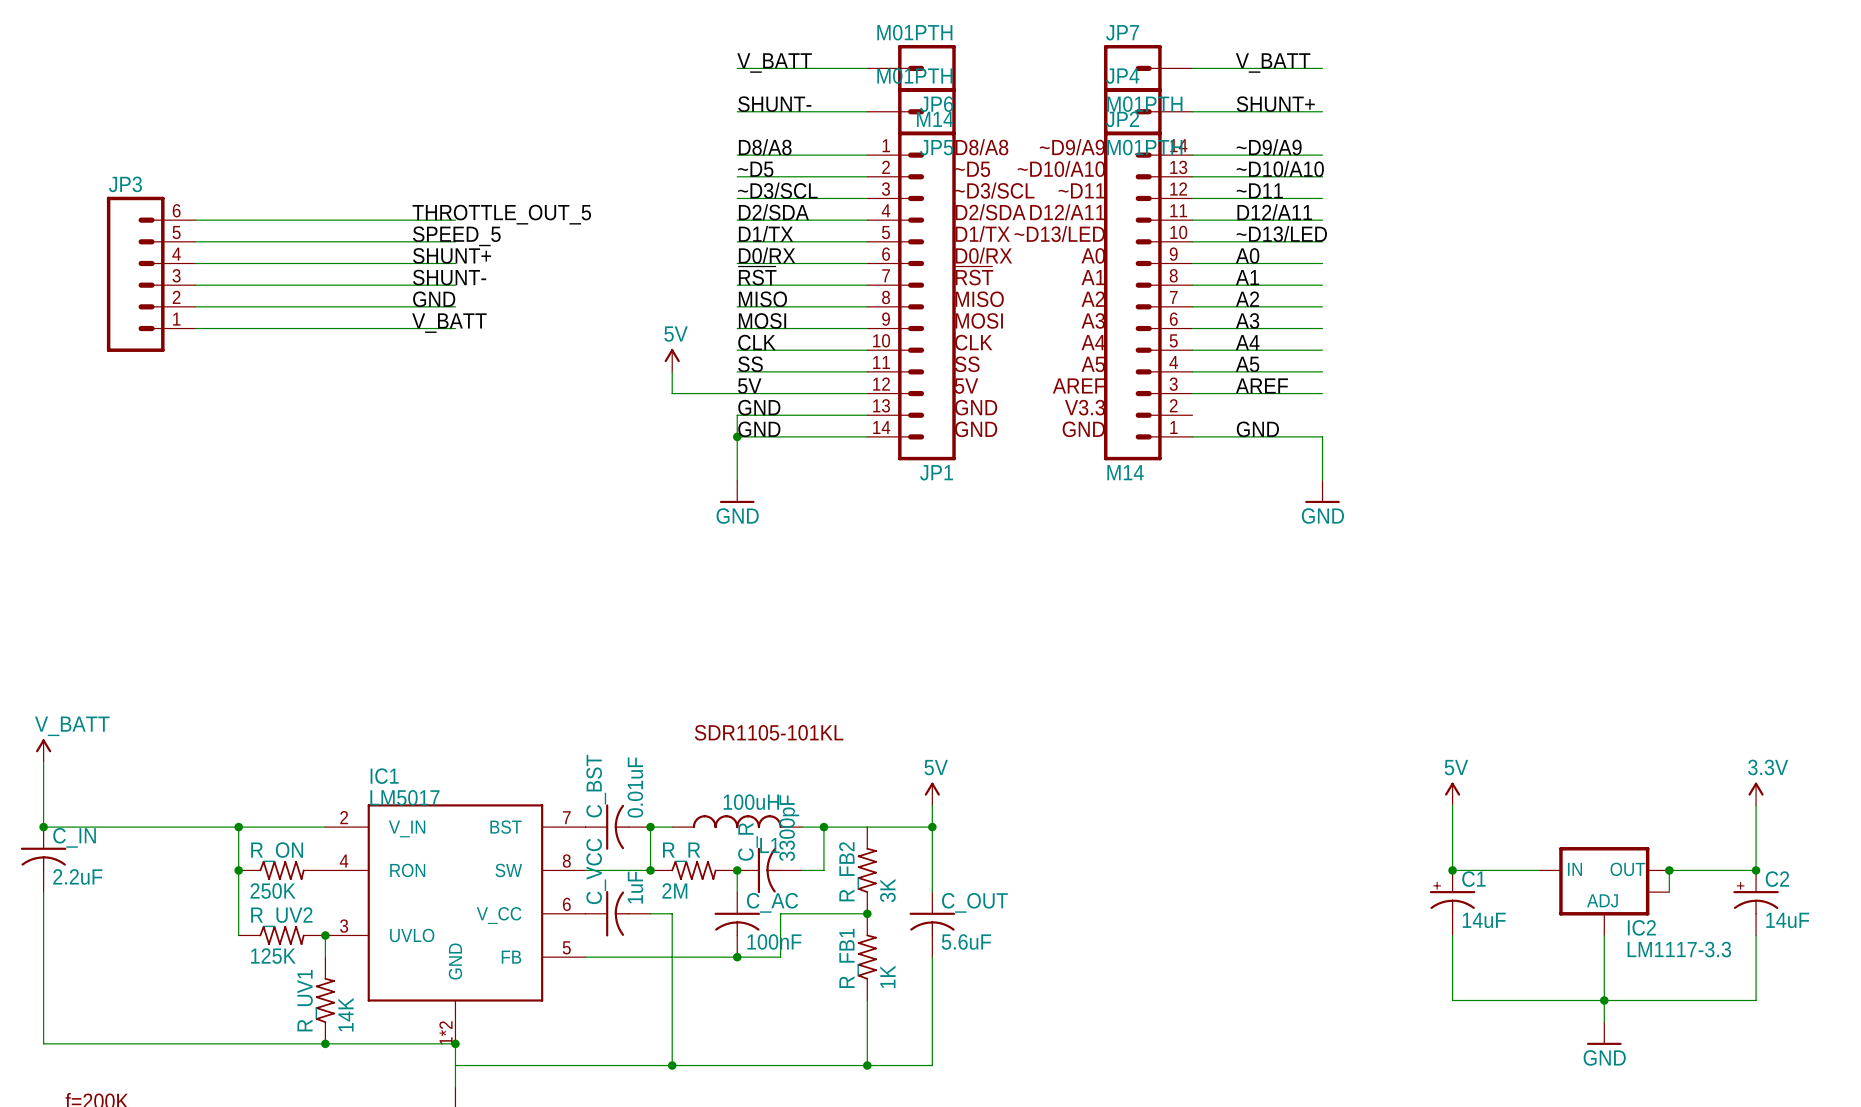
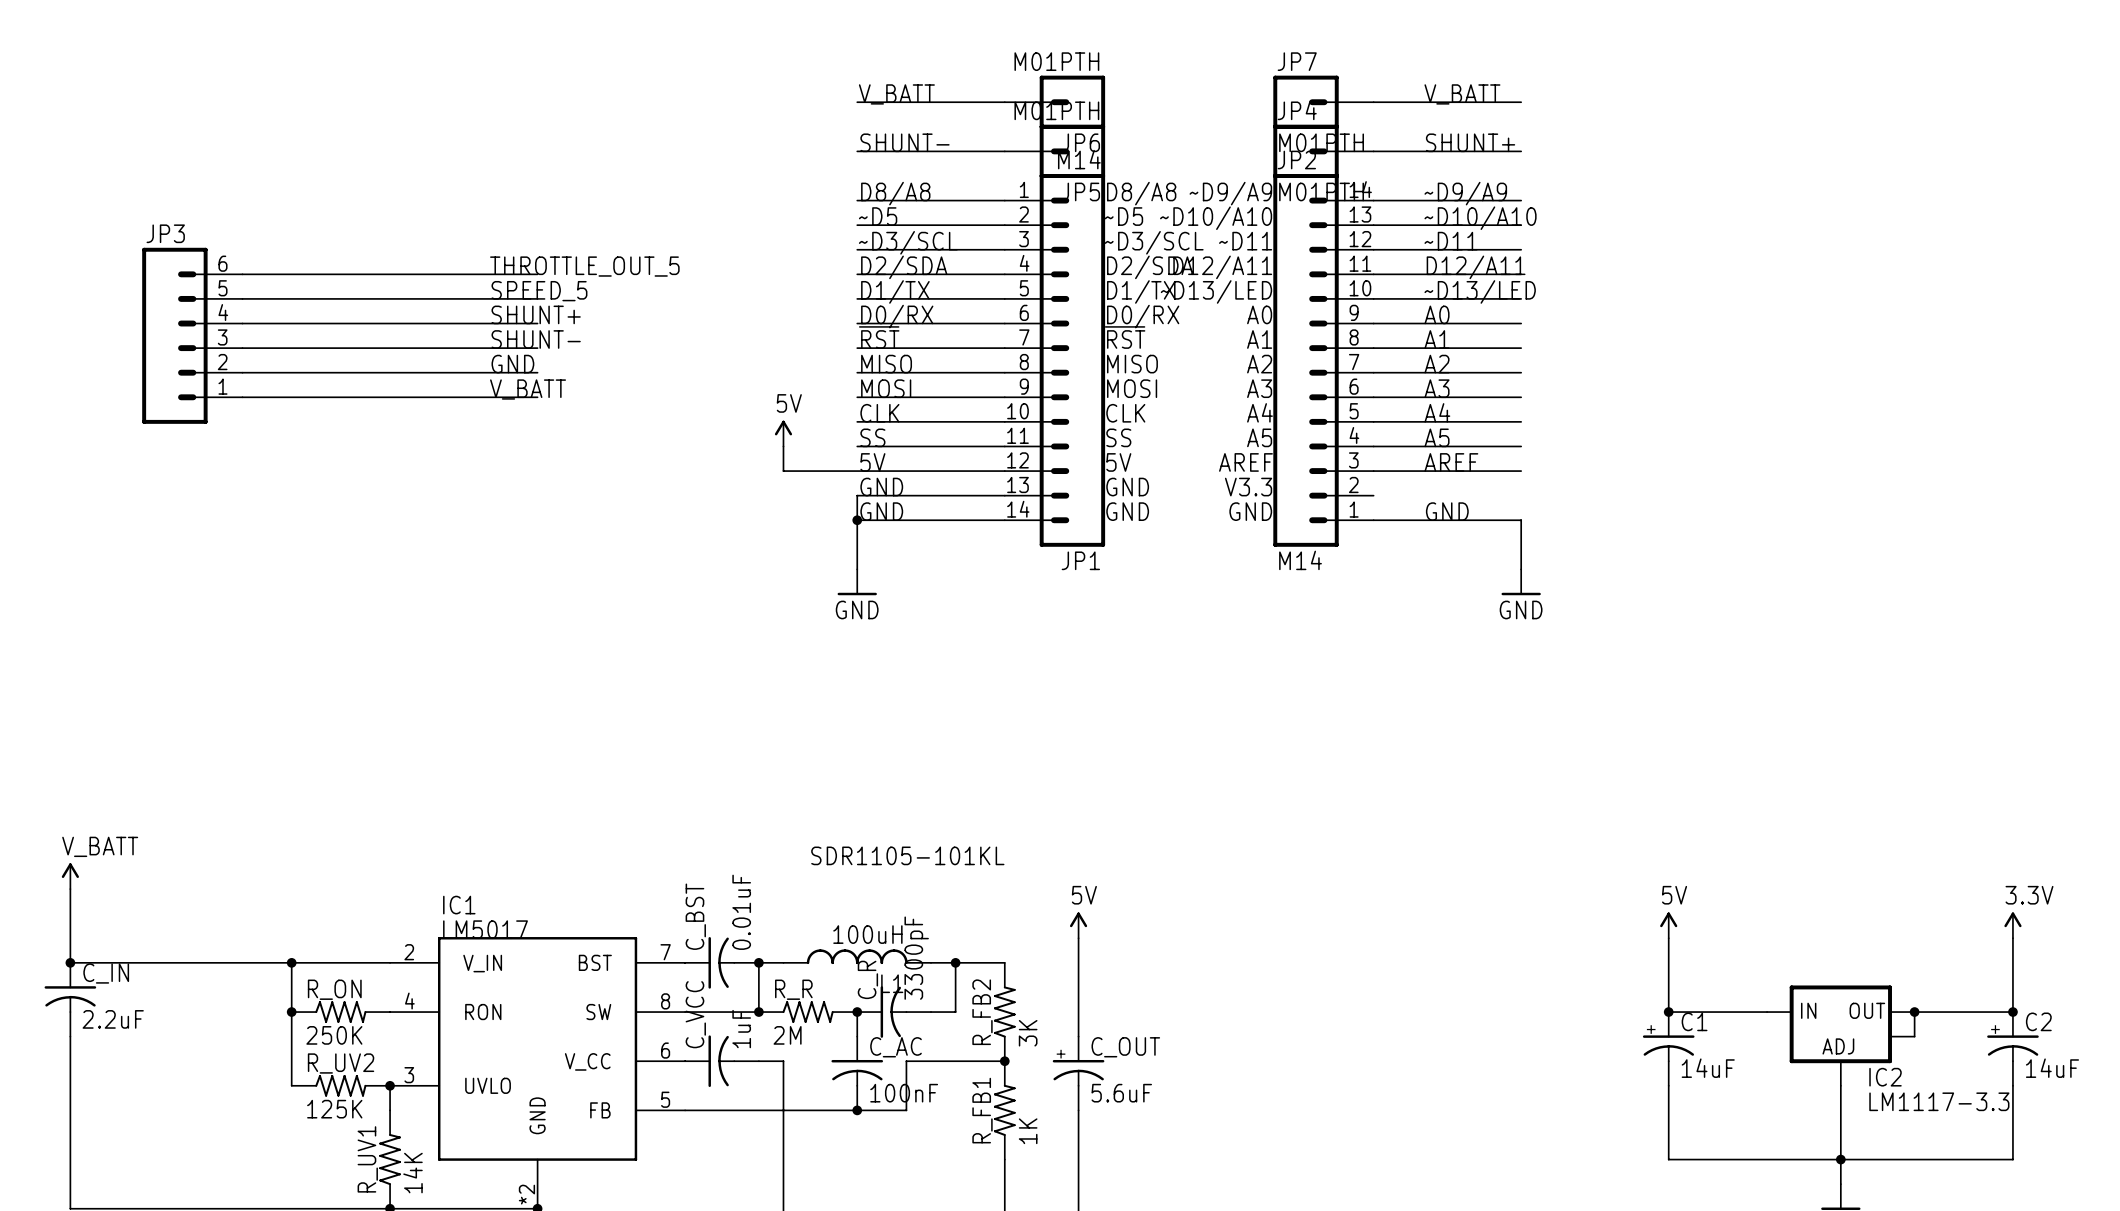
wire: (867, 827) (932, 827) -> none
junction: (932, 827) -> none
C_OUT symbol: [909, 892, 956, 958] -> [1052, 1036, 1105, 1111]

